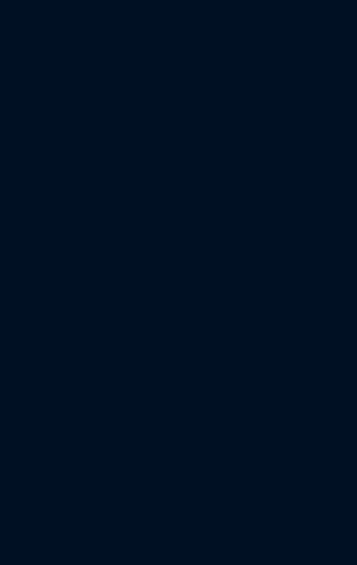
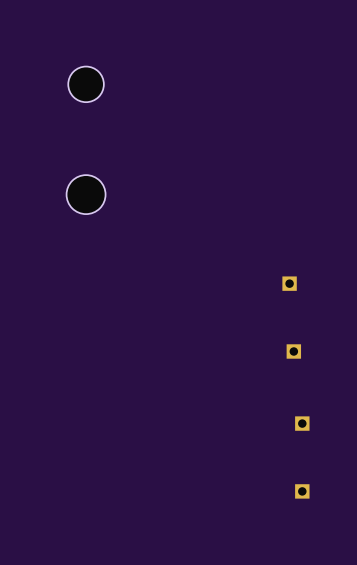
part: none -> (86, 84)
part: none -> (86, 194)
part: none -> (289, 283)
part: none -> (293, 351)
part: none -> (302, 423)
part: none -> (302, 491)

